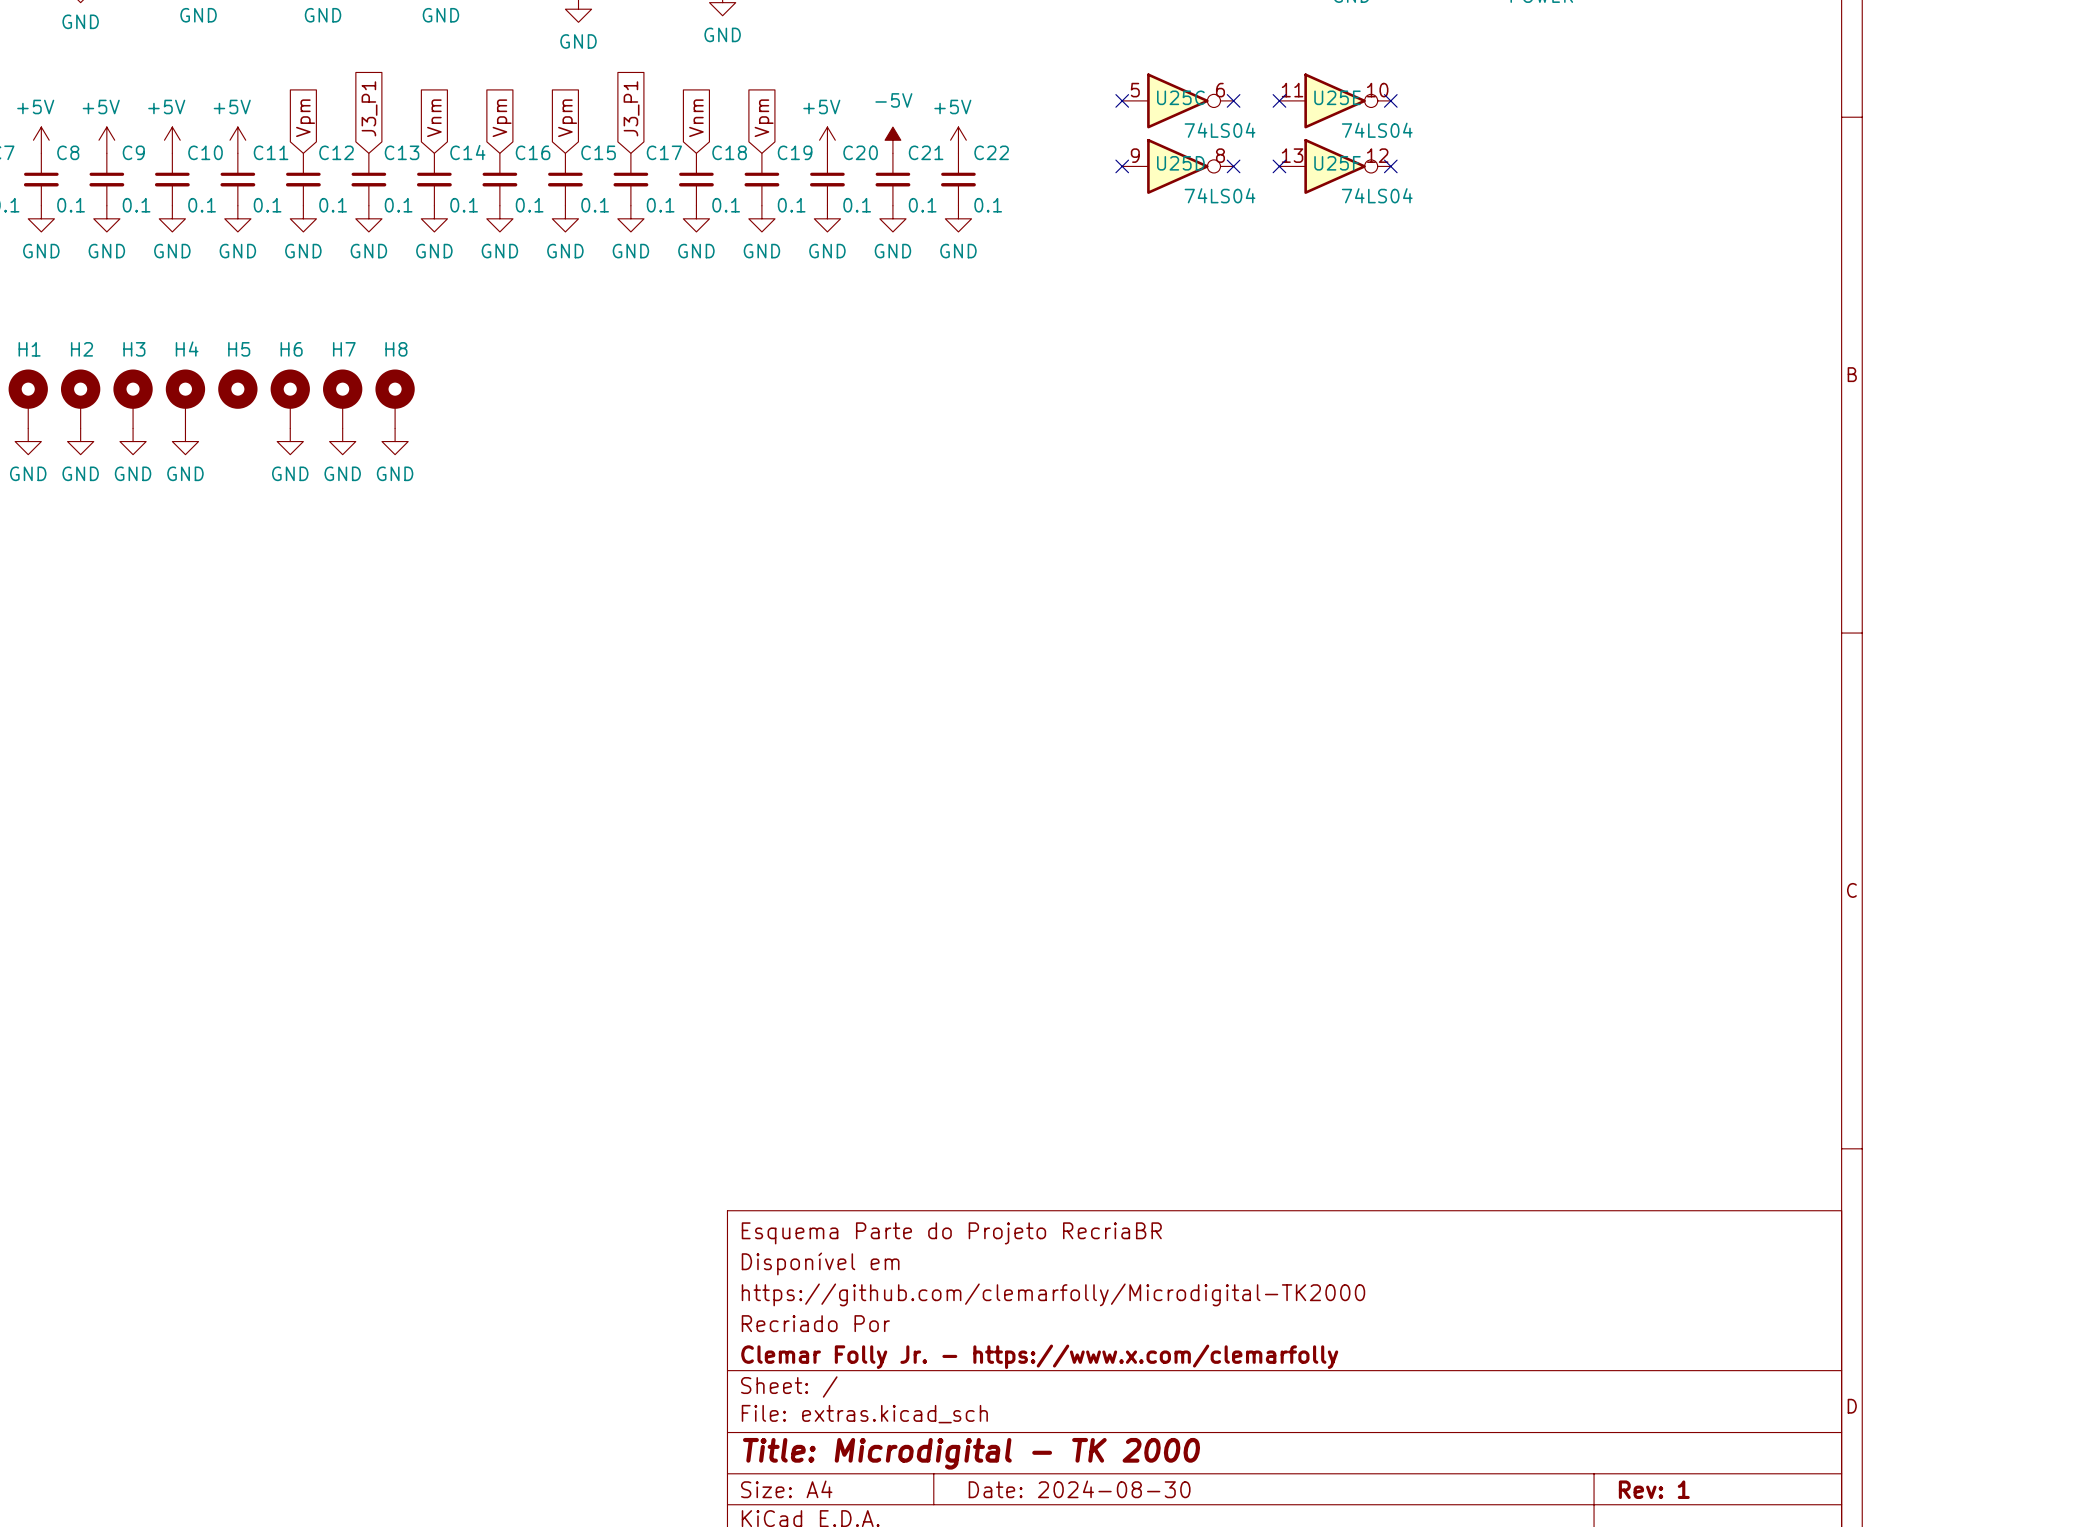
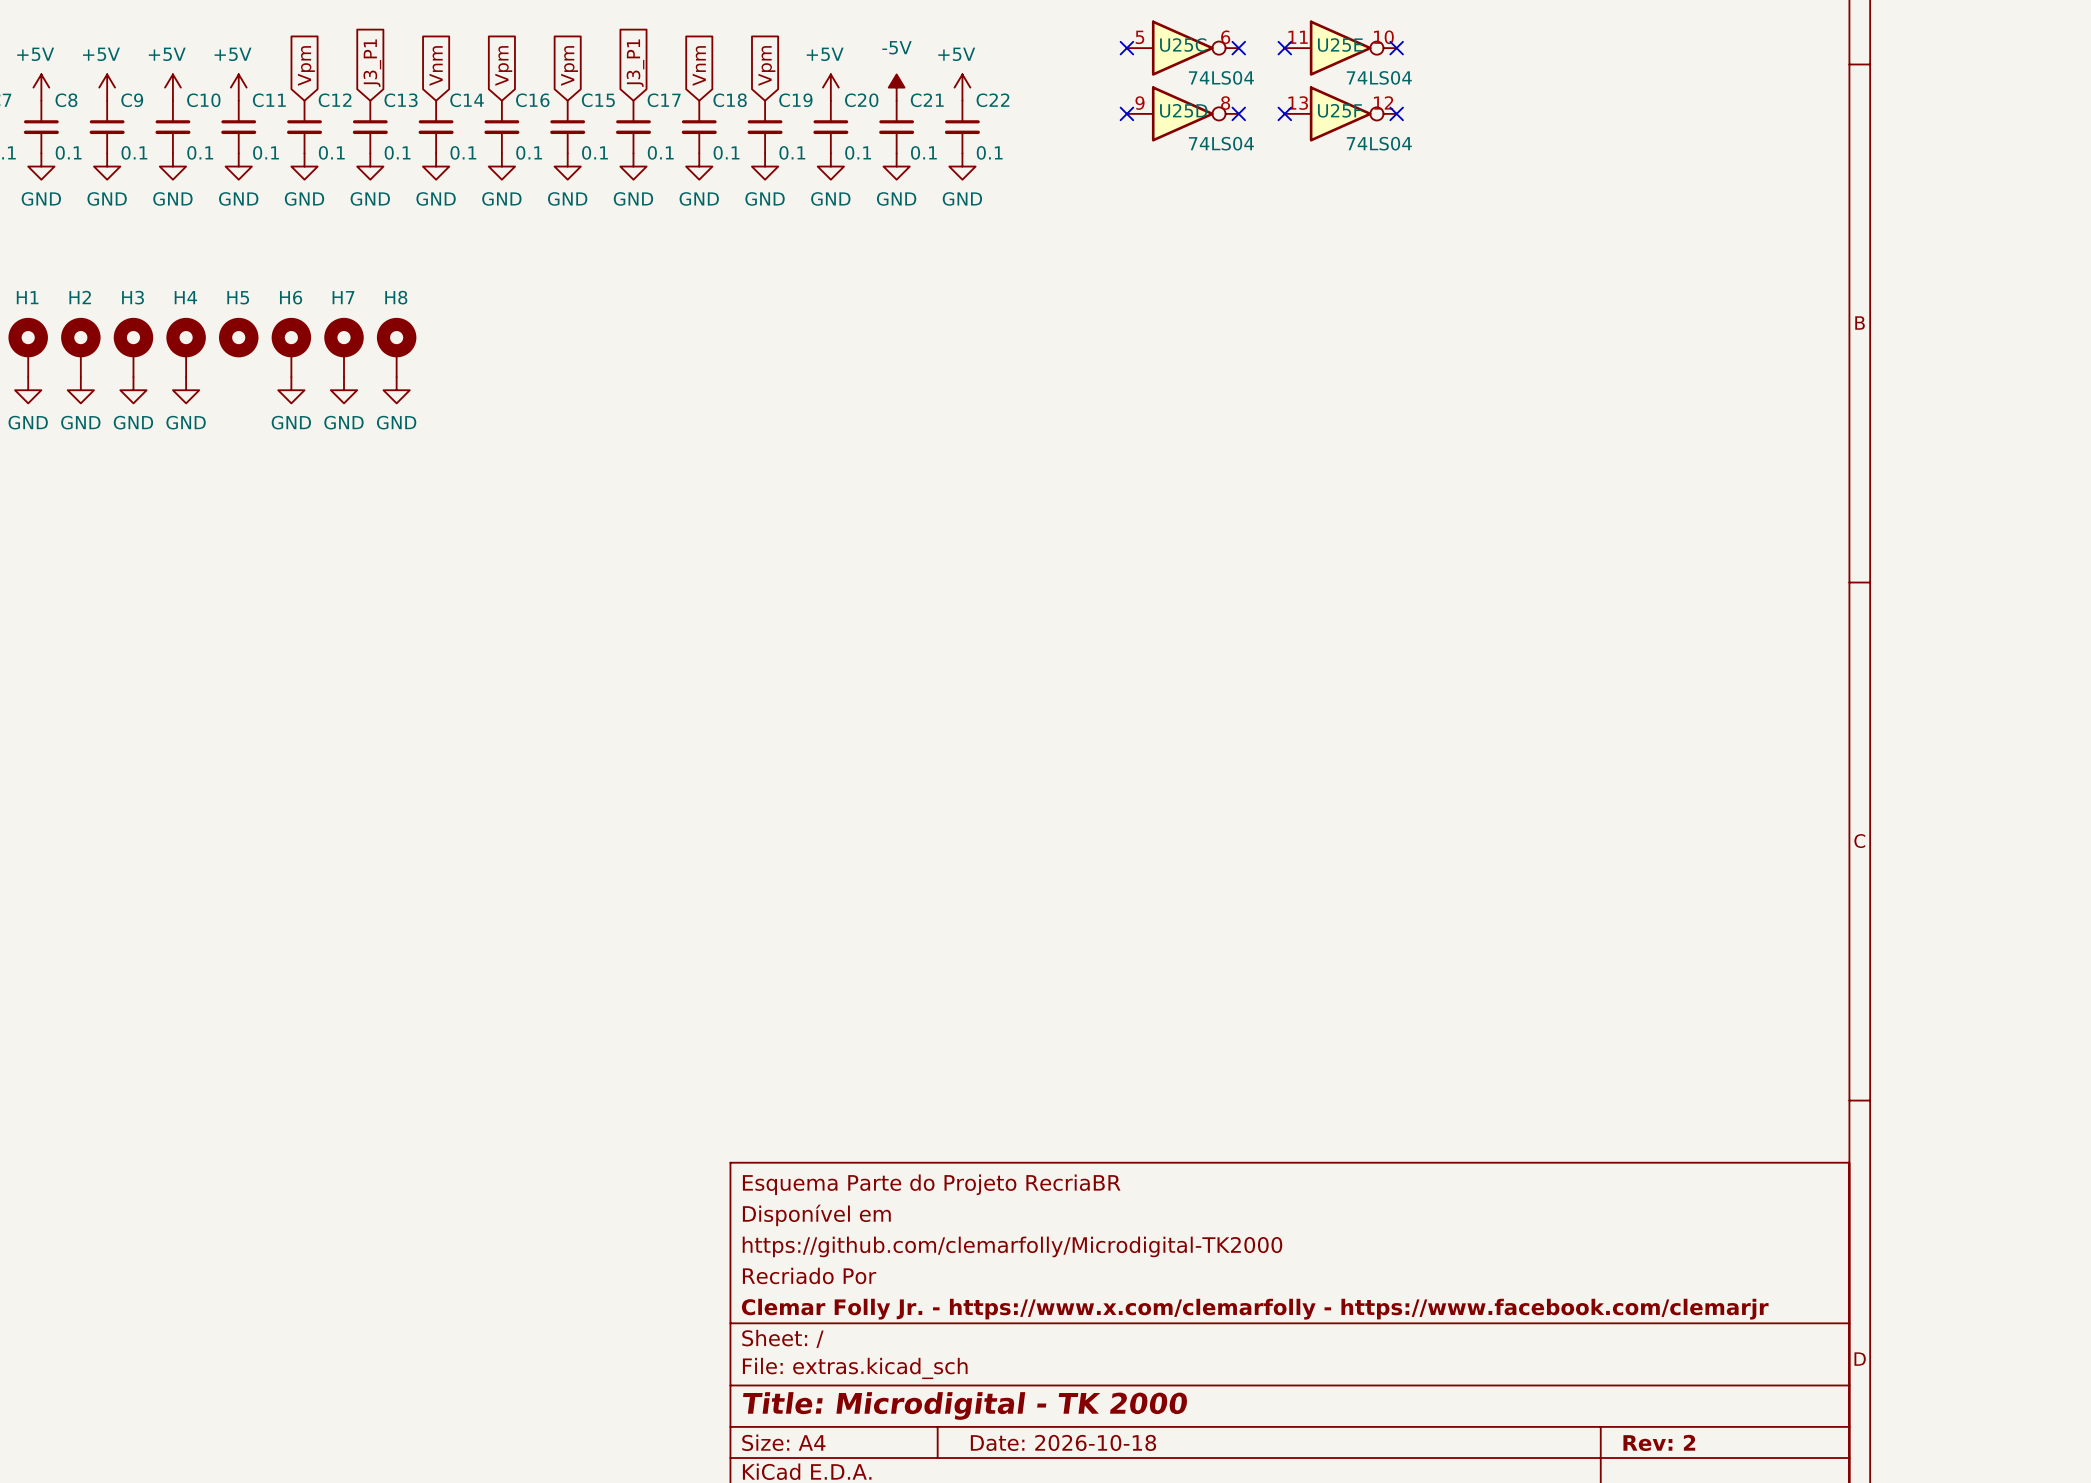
title block: Clemar Folly Jr. - https://www.x.com/clemarfolly (1039, 1356) -> Clemar Folly Jr. - https://www.x.com/clemarfolly - https://www.facebook.com/clemarjr (1255, 1309)
title block: Date: 2024-08-30 (1079, 1489) -> Date: 2026-10-18 (1063, 1442)
title block: Rev: 1 (1654, 1489) -> Rev: 2 (1659, 1442)

